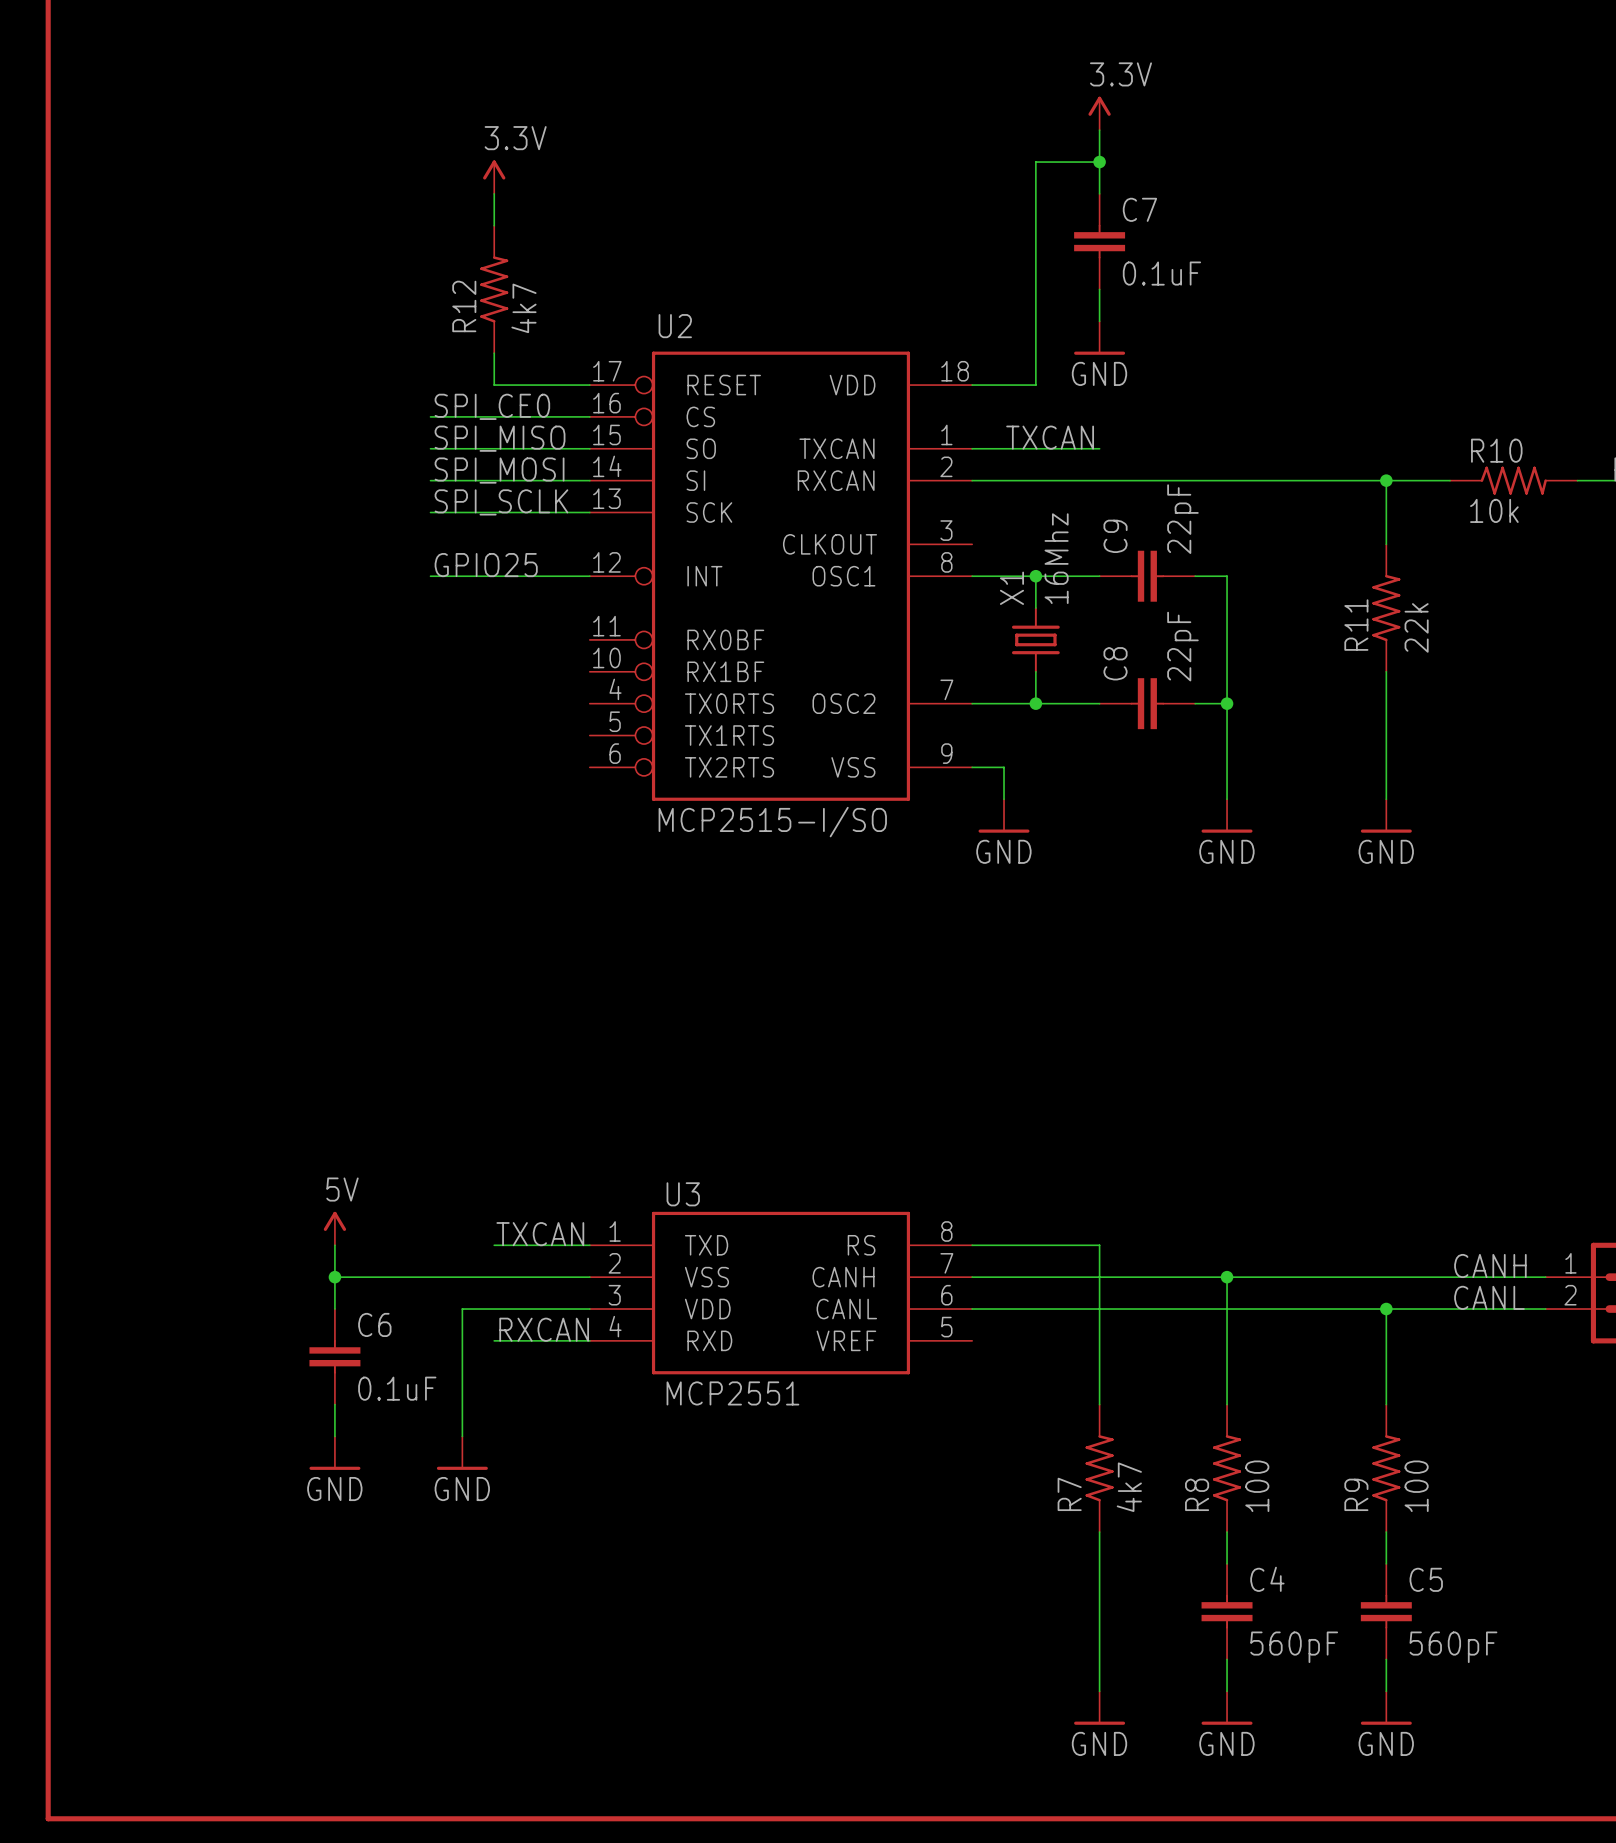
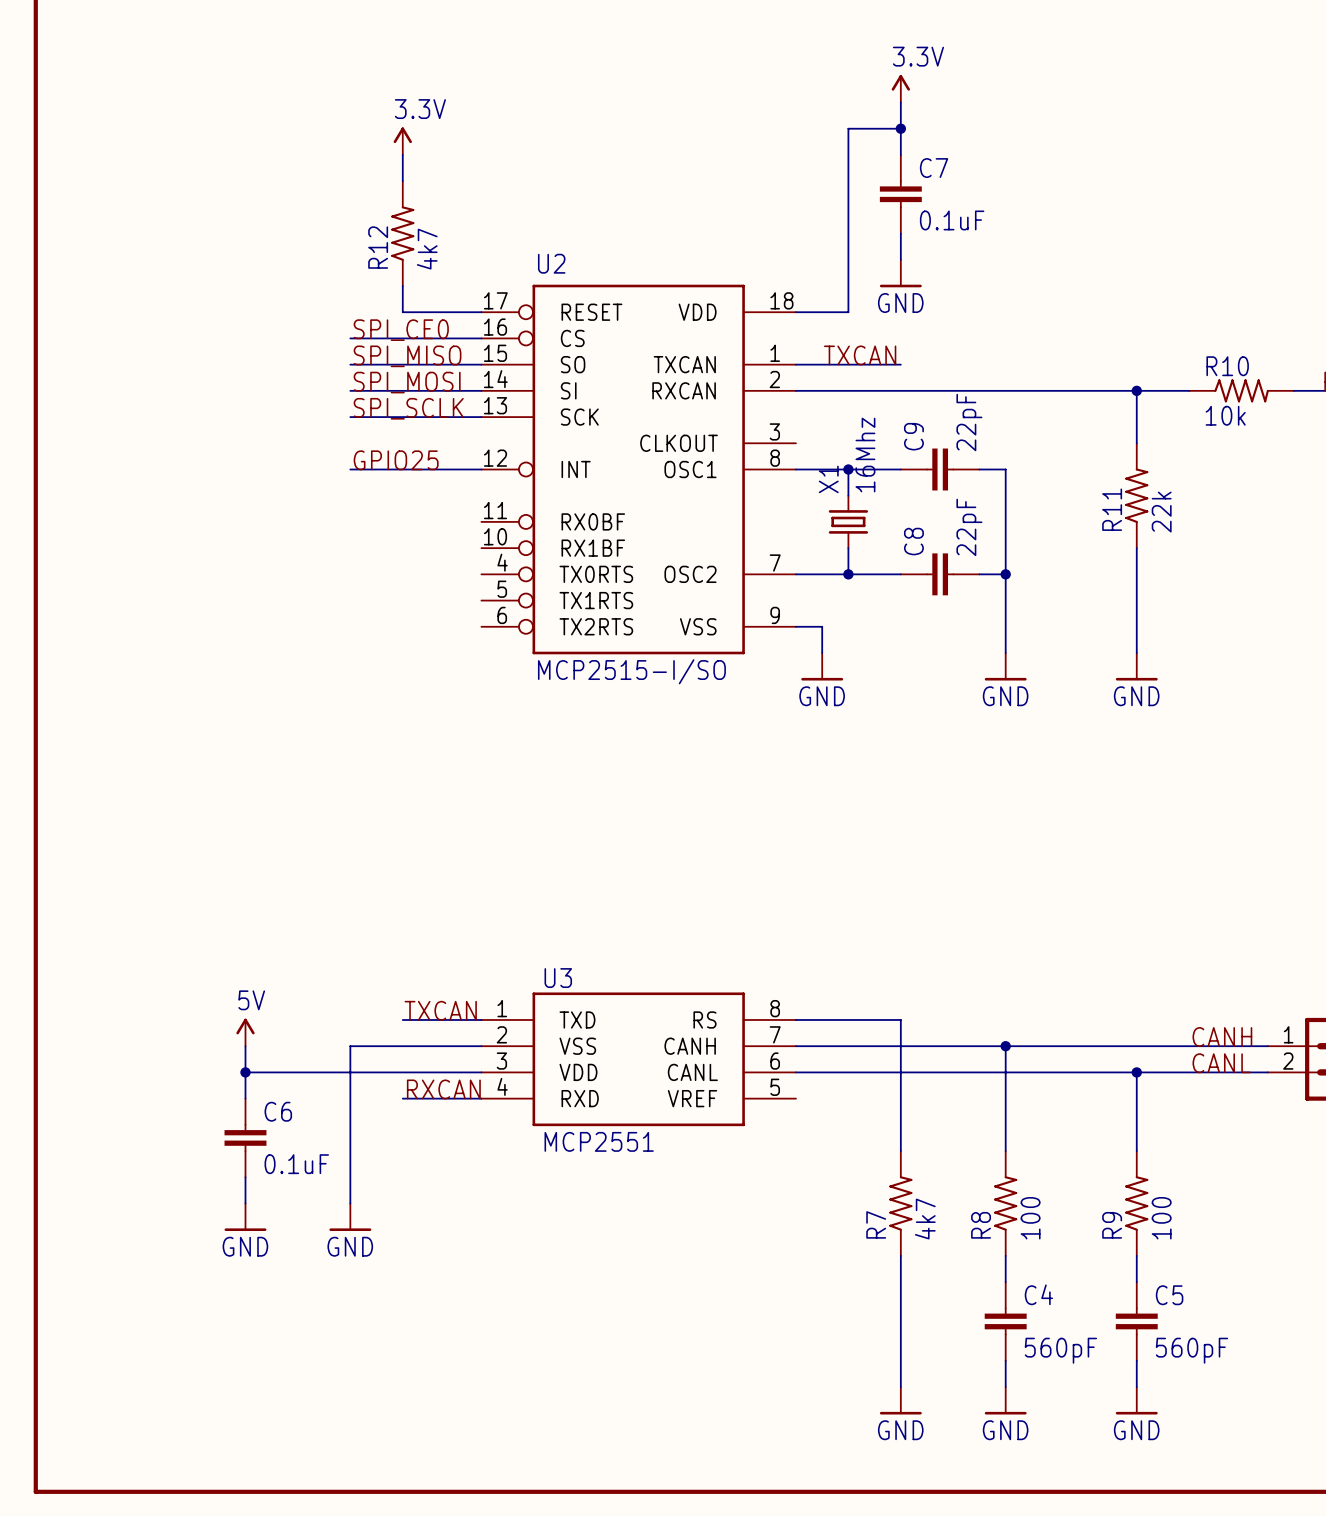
power symbol position: 5V (334, 1228) -> 5V (245, 1032)
wire: (334, 1245) (334, 1309) -> (245, 1046) (245, 1098)
wire: (334, 1277) (430, 1277) -> (350, 1203) (350, 1046)
junction position: (334, 1277) -> (245, 1072)
wire: (462, 1309) (462, 1436) -> (376, 1072) (245, 1072)
C6 position: (334, 1356) -> (245, 1137)
wire: (334, 1404) (334, 1436) -> (245, 1177) (245, 1203)
power symbol position: GND (334, 1453) -> GND (245, 1217)
power symbol position: GND (462, 1453) -> GND (350, 1217)

